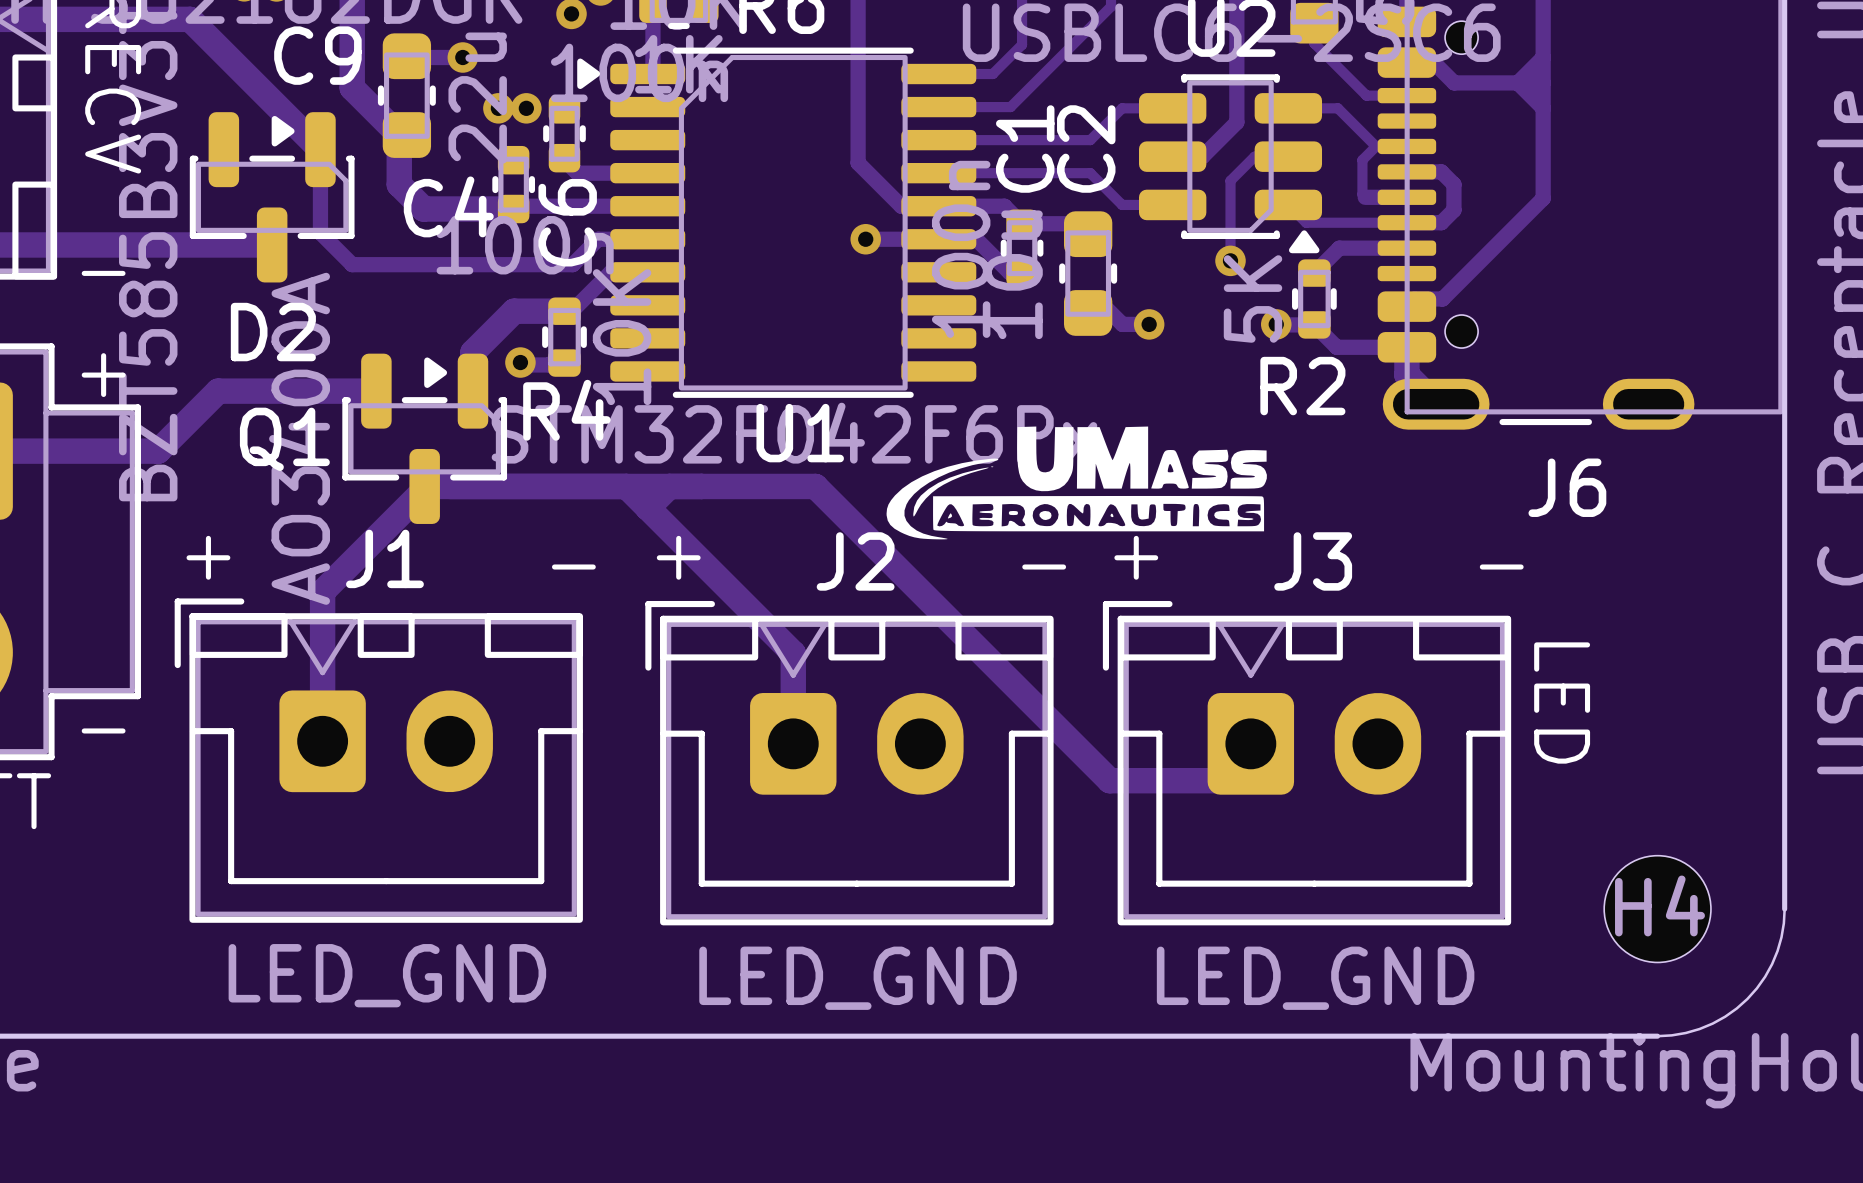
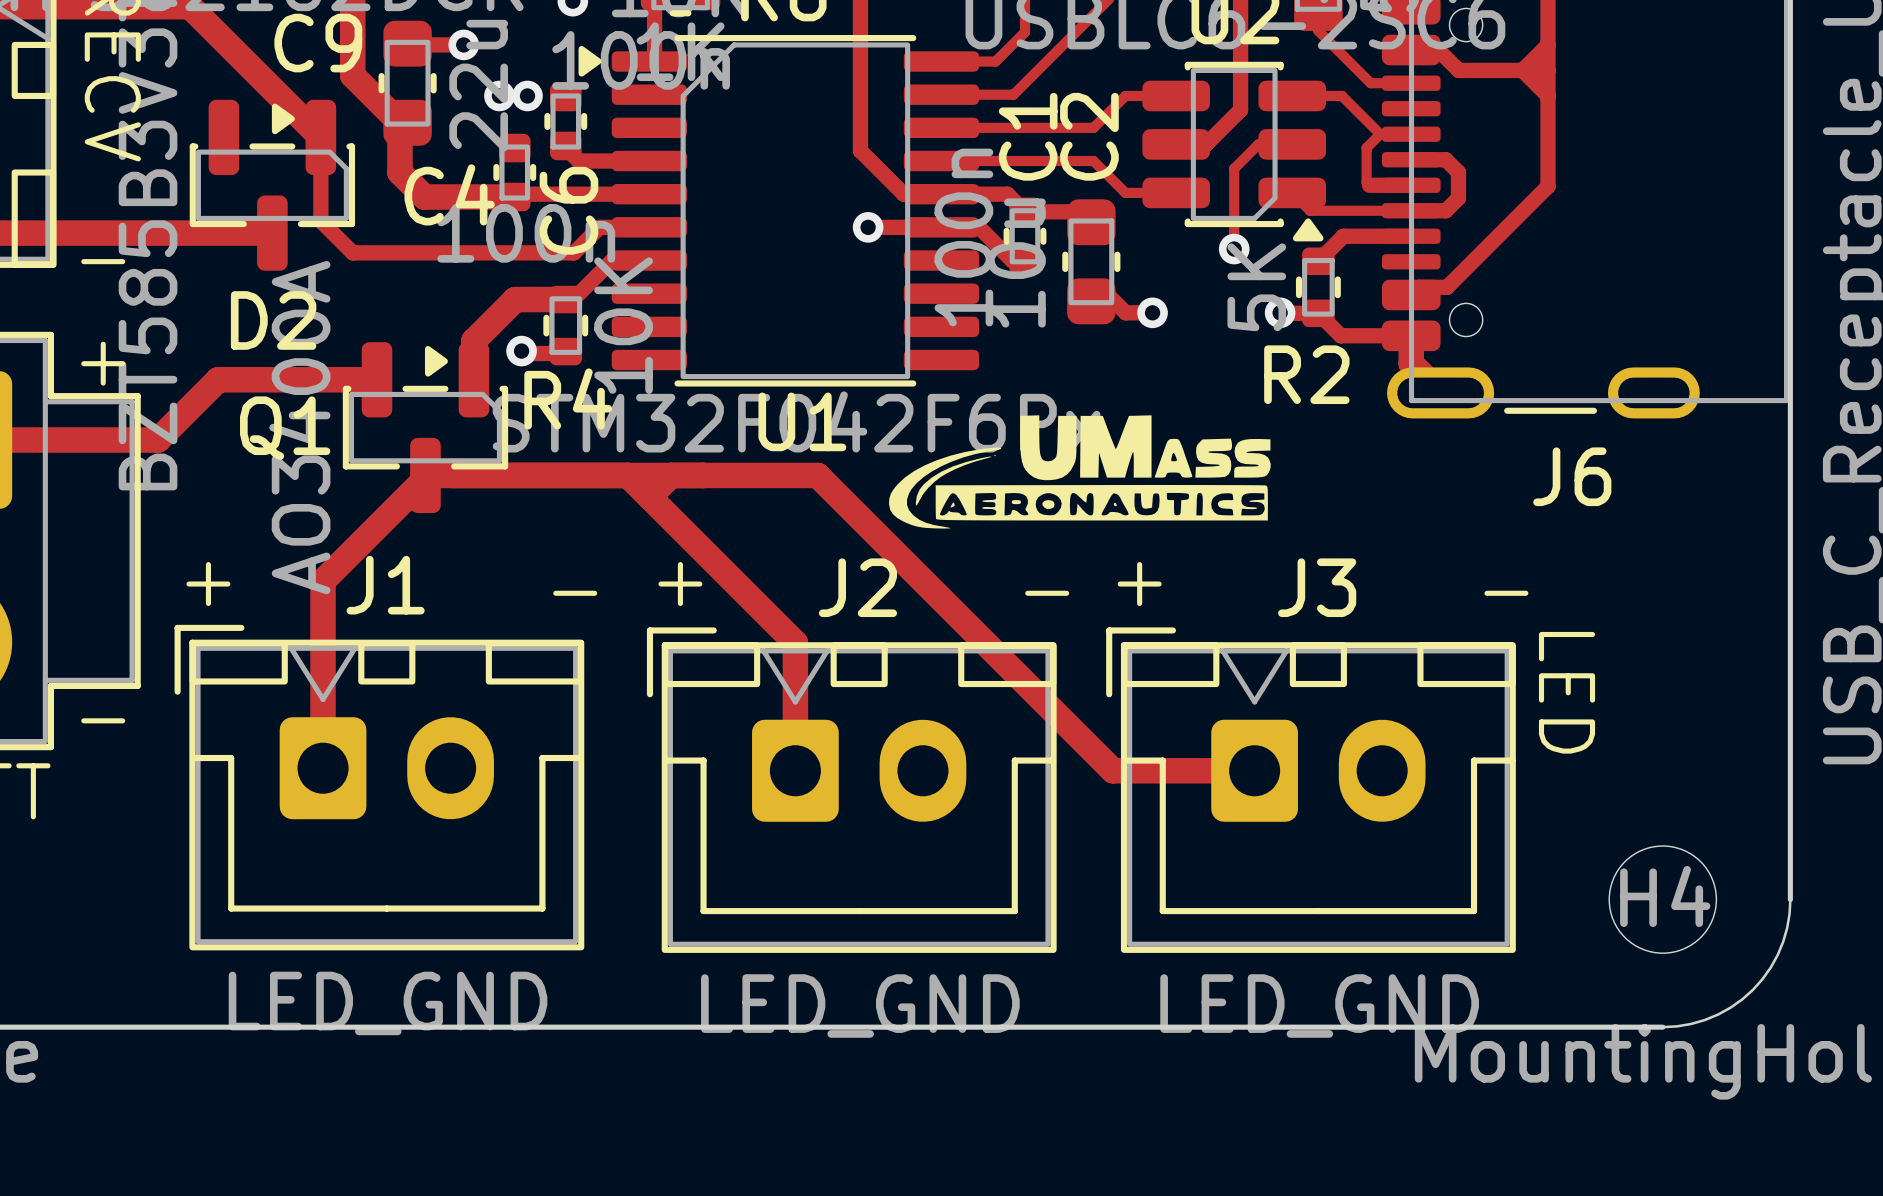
text position: + (208, 557) -> + (208, 584)
text position: + (678, 557) -> + (680, 584)
text position: + (1136, 557) -> + (1139, 584)
text position: - (573, 567) -> - (575, 593)
text position: - (1044, 567) -> - (1047, 593)
text position: - (1501, 567) -> - (1506, 593)
J1 position: (378, 760) -> (379, 787)
J2 position: (849, 763) -> (851, 790)
J3 position: (1307, 763) -> (1311, 790)

